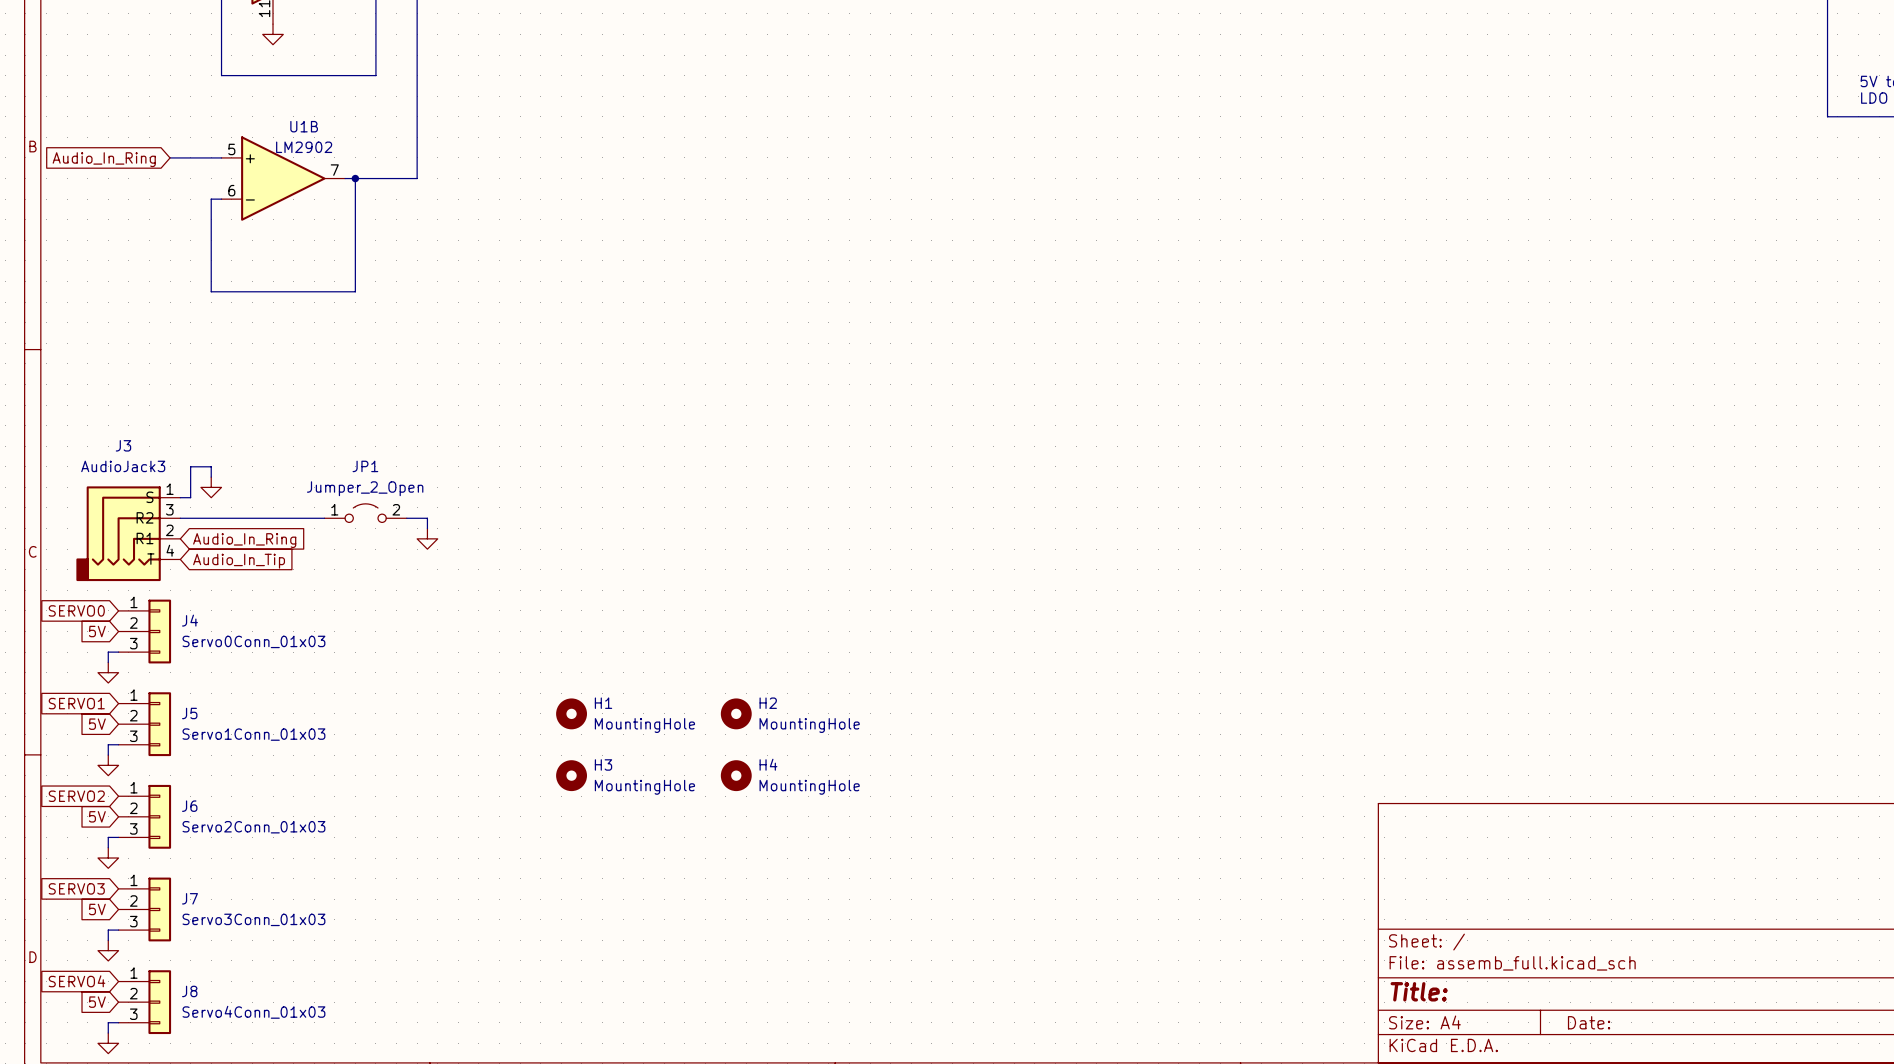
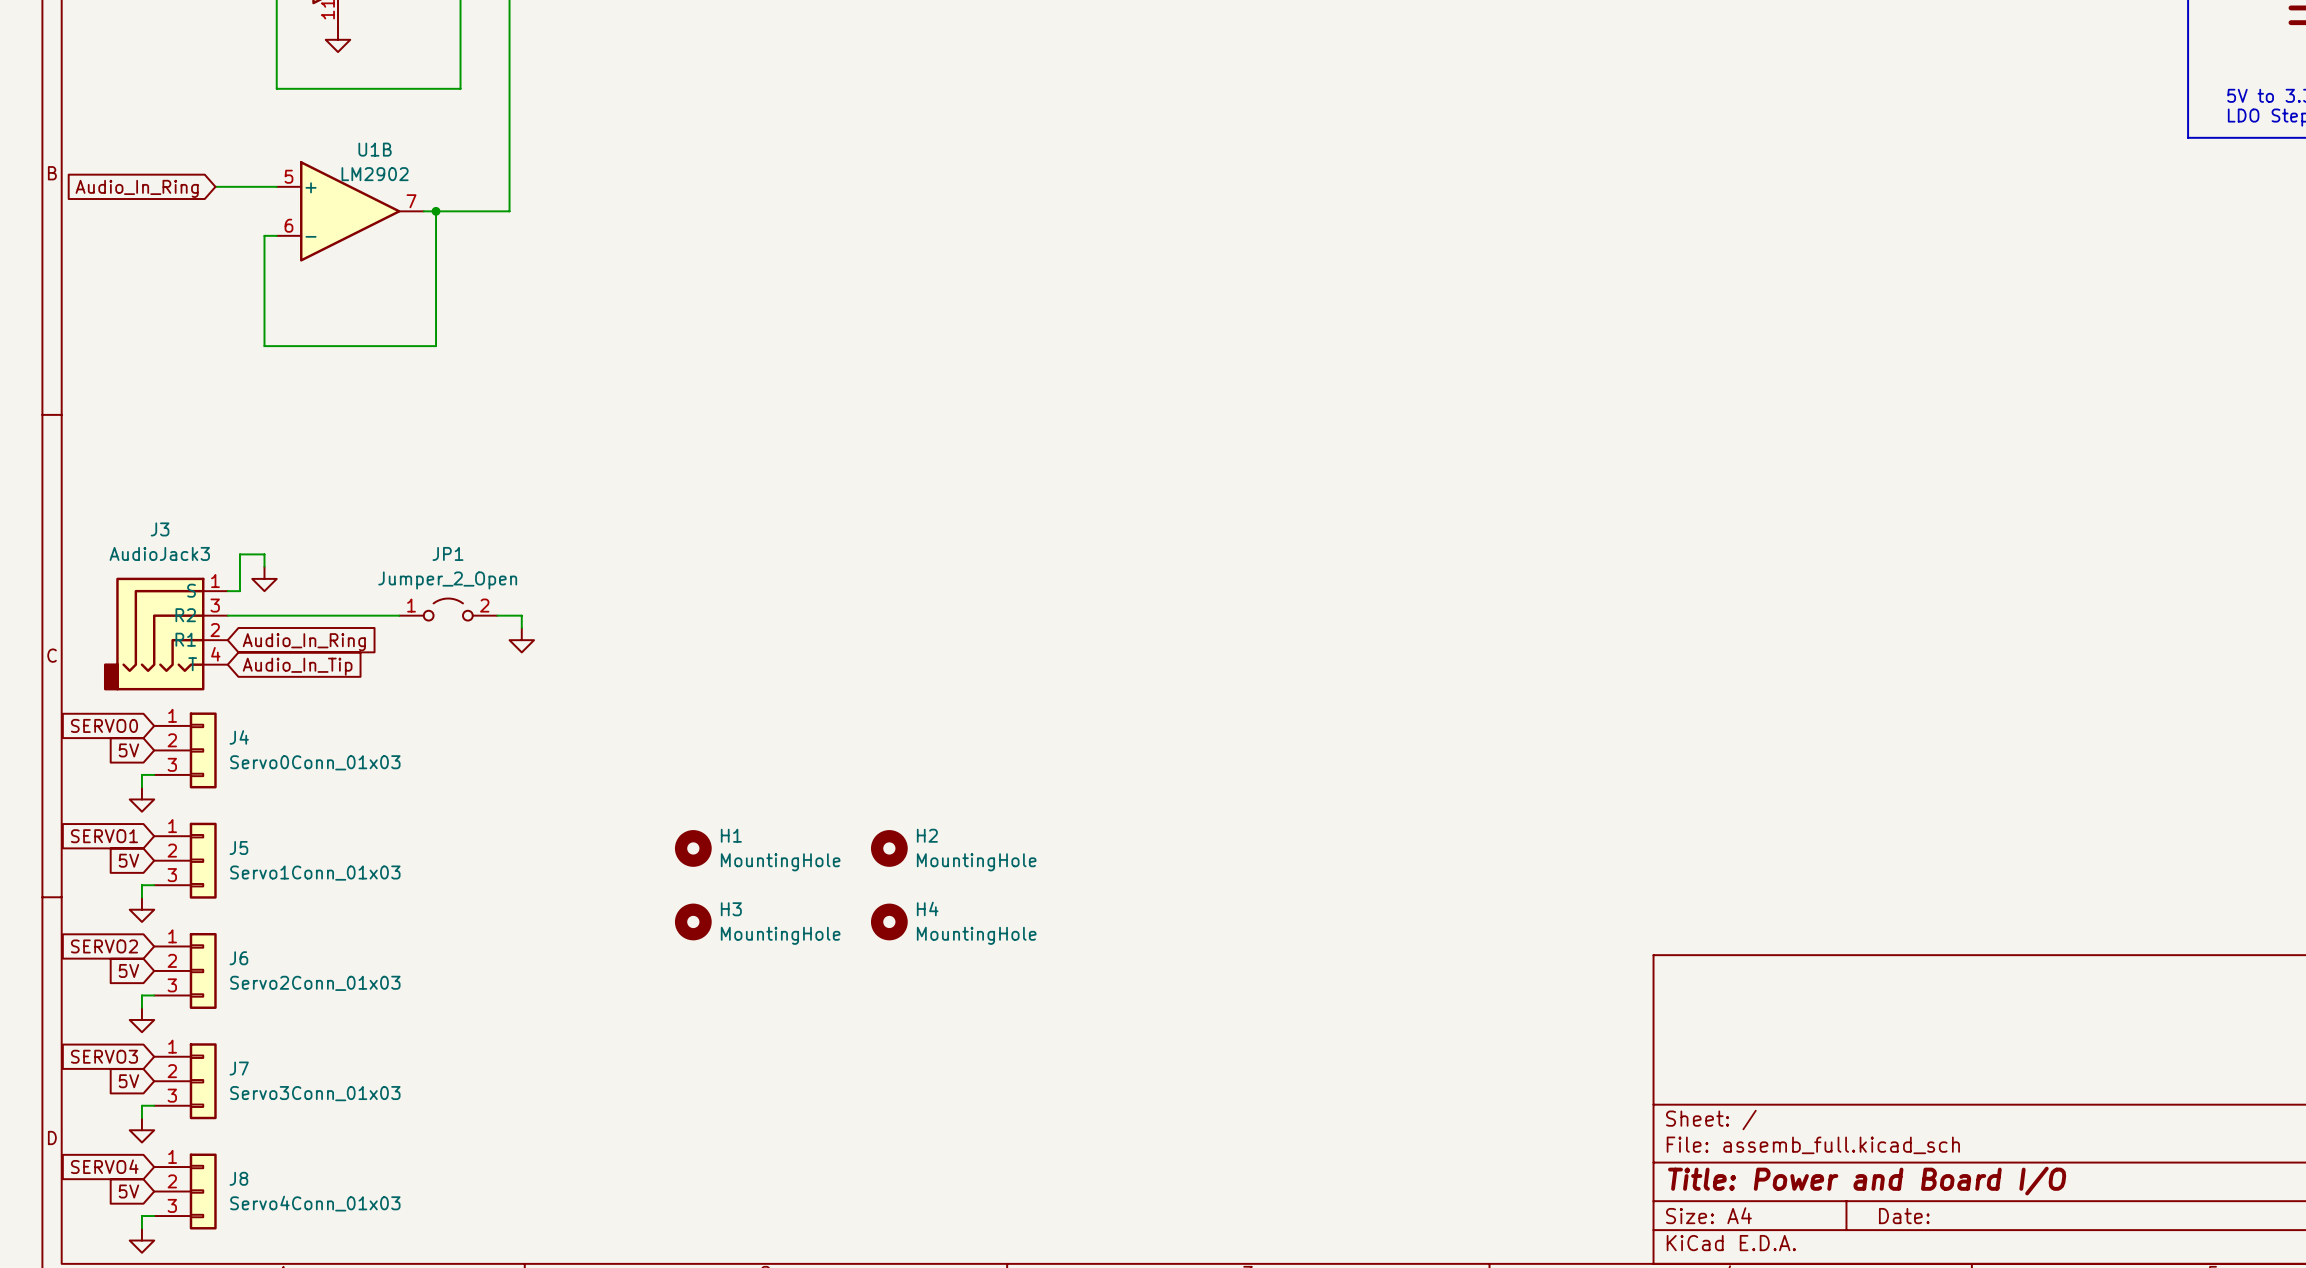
title block: Title: (1419, 991) -> Title: Power and Board I/O (1867, 1181)

